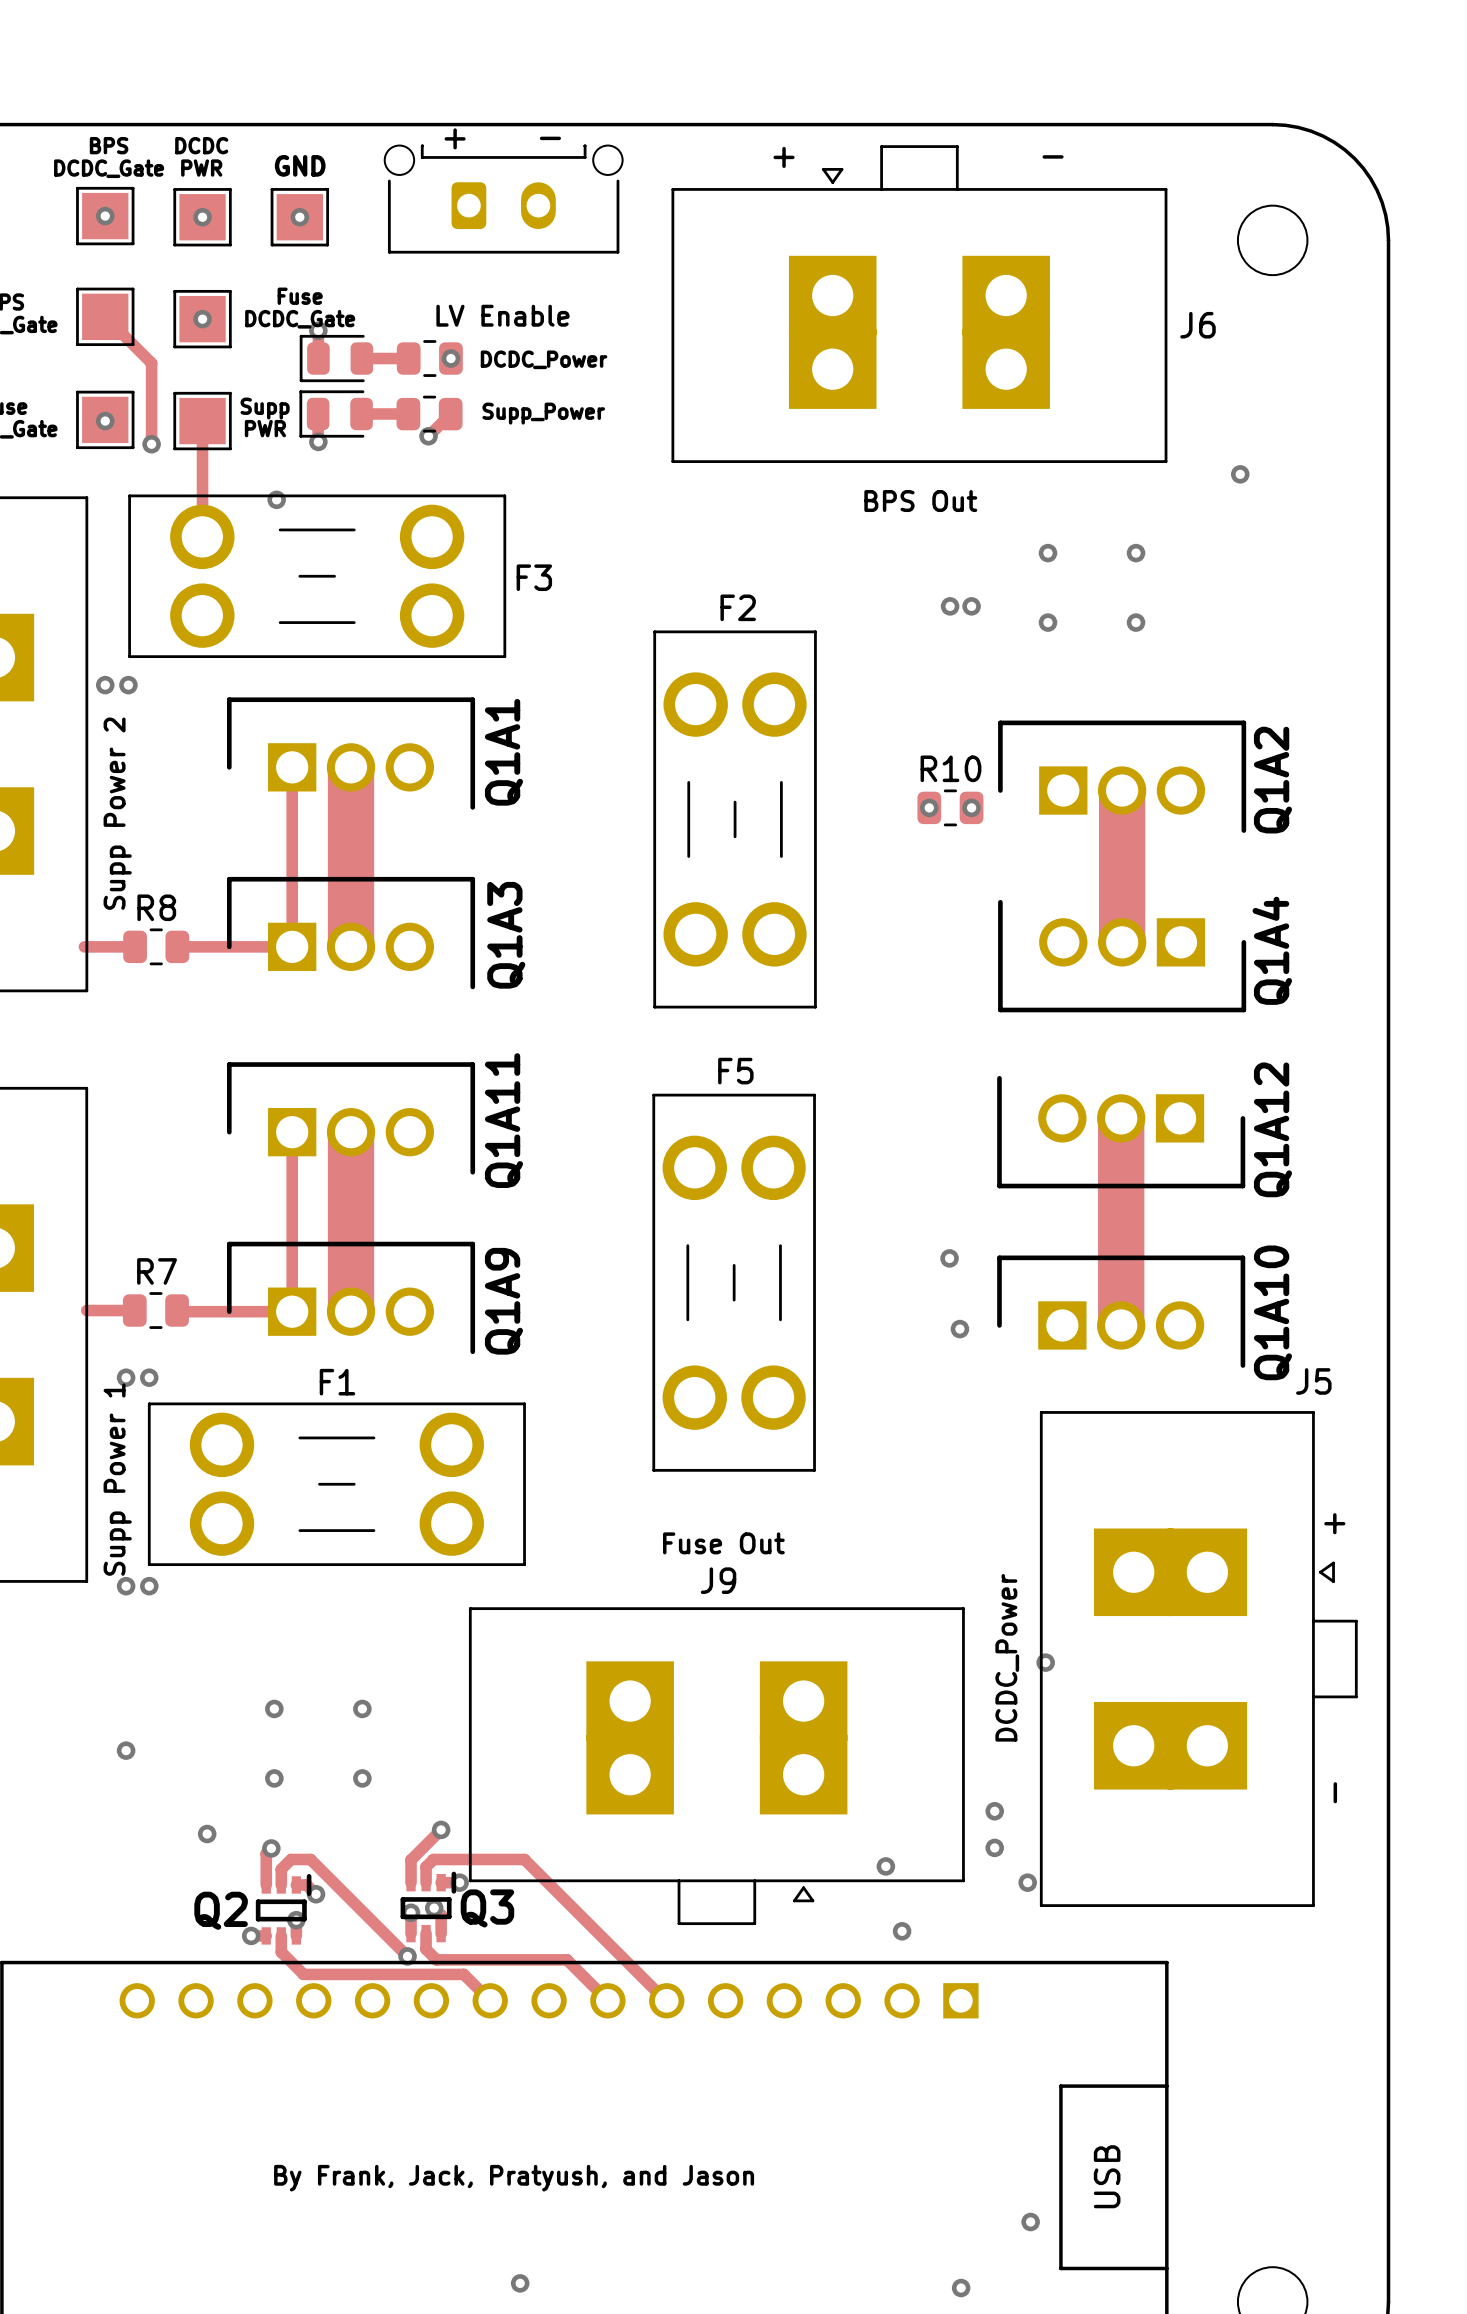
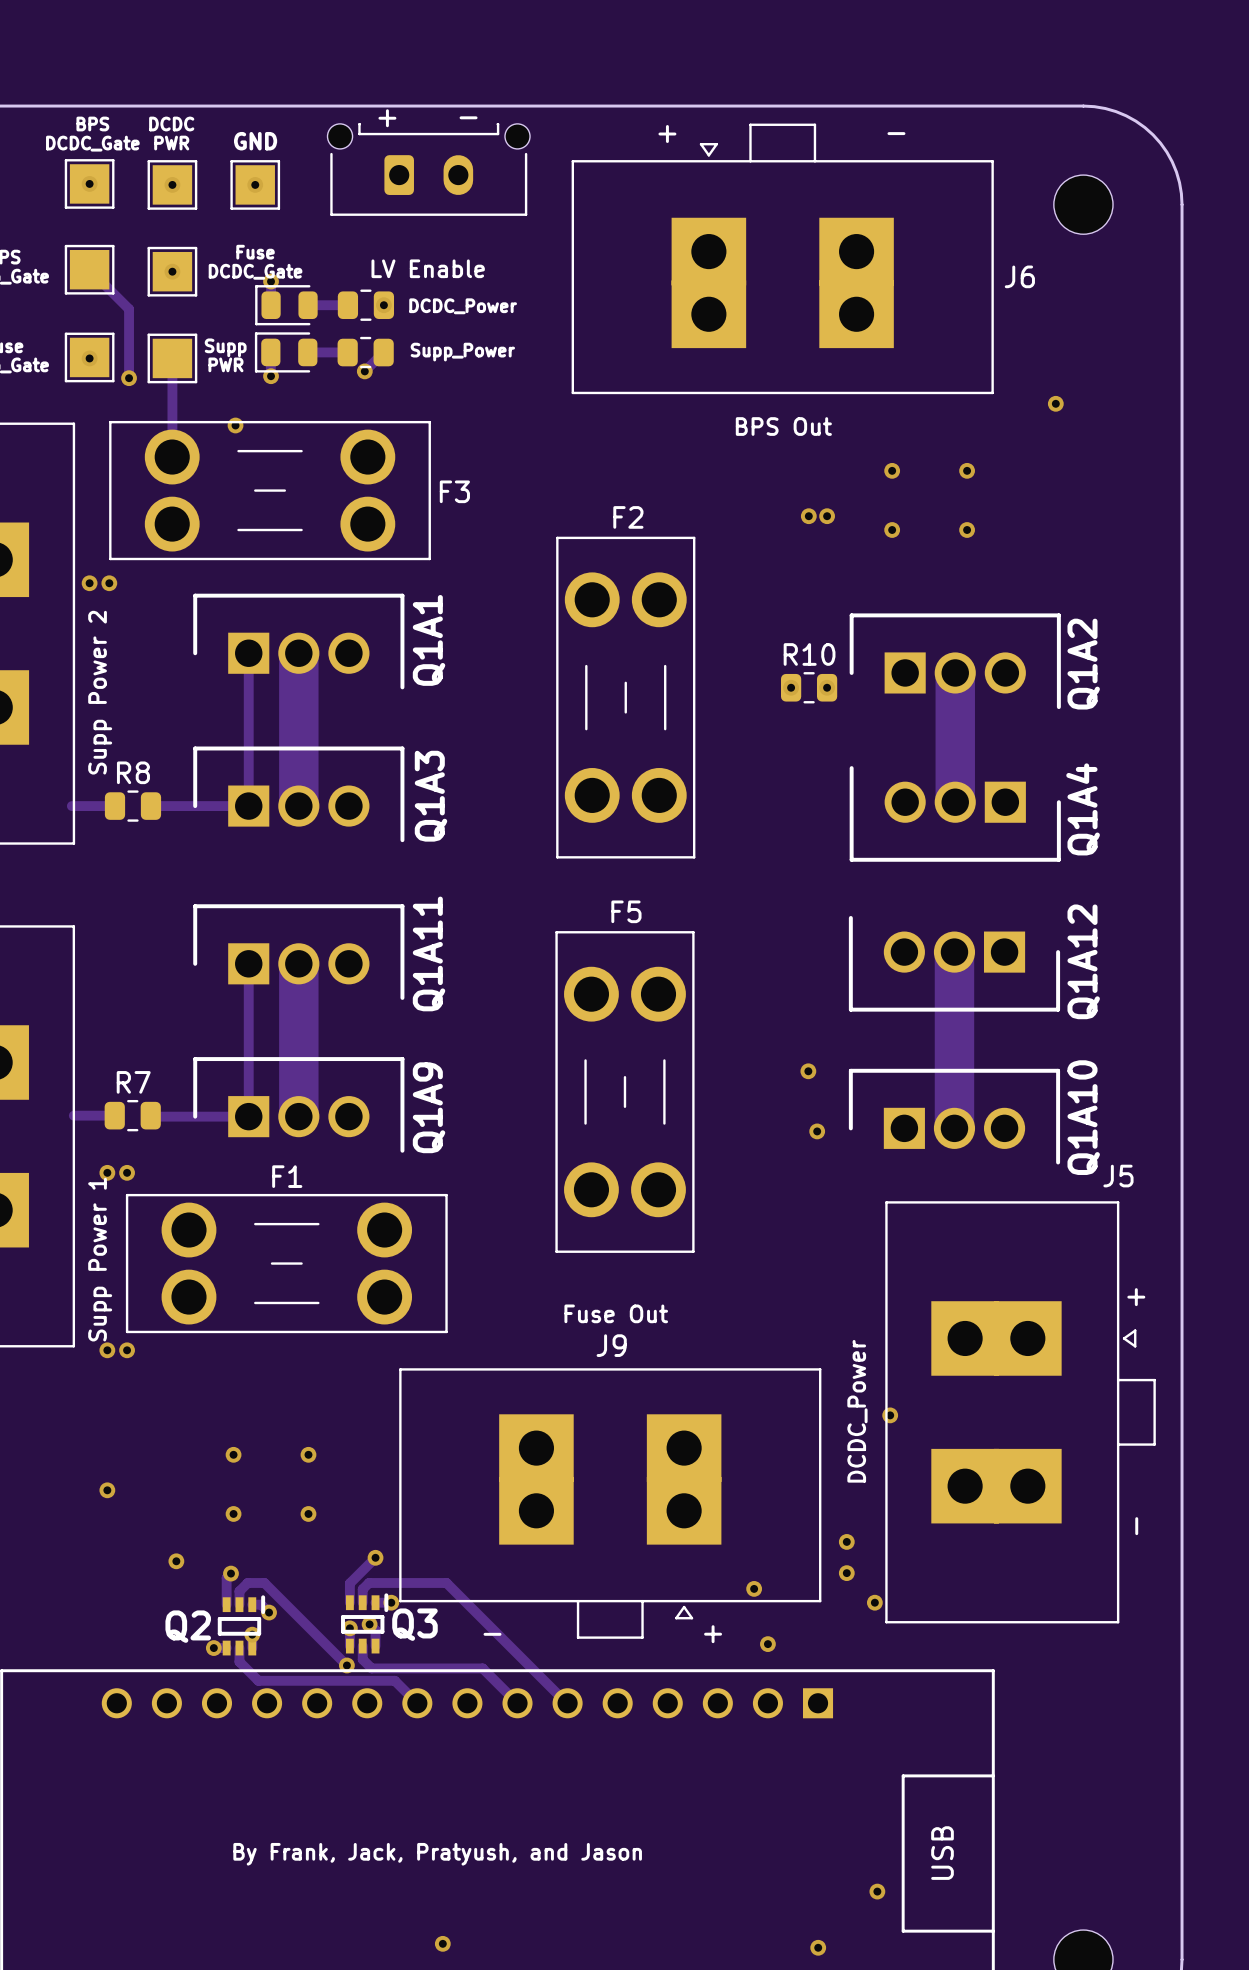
text: none -> - (492, 1634)
text: none -> + (713, 1634)

